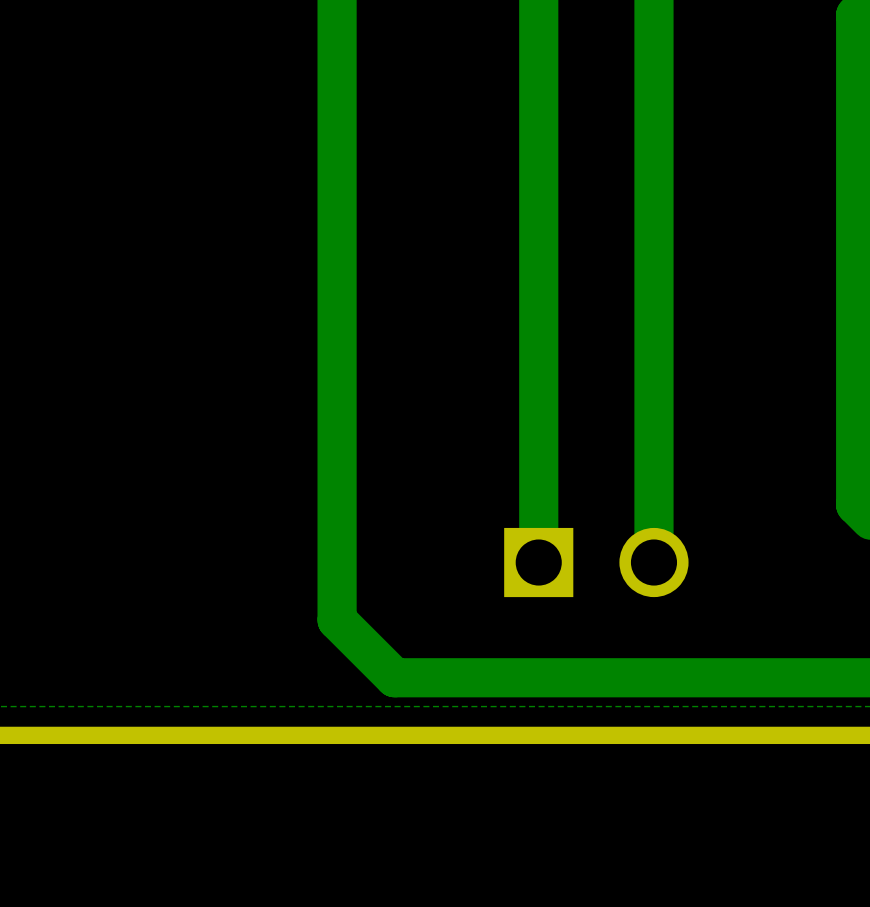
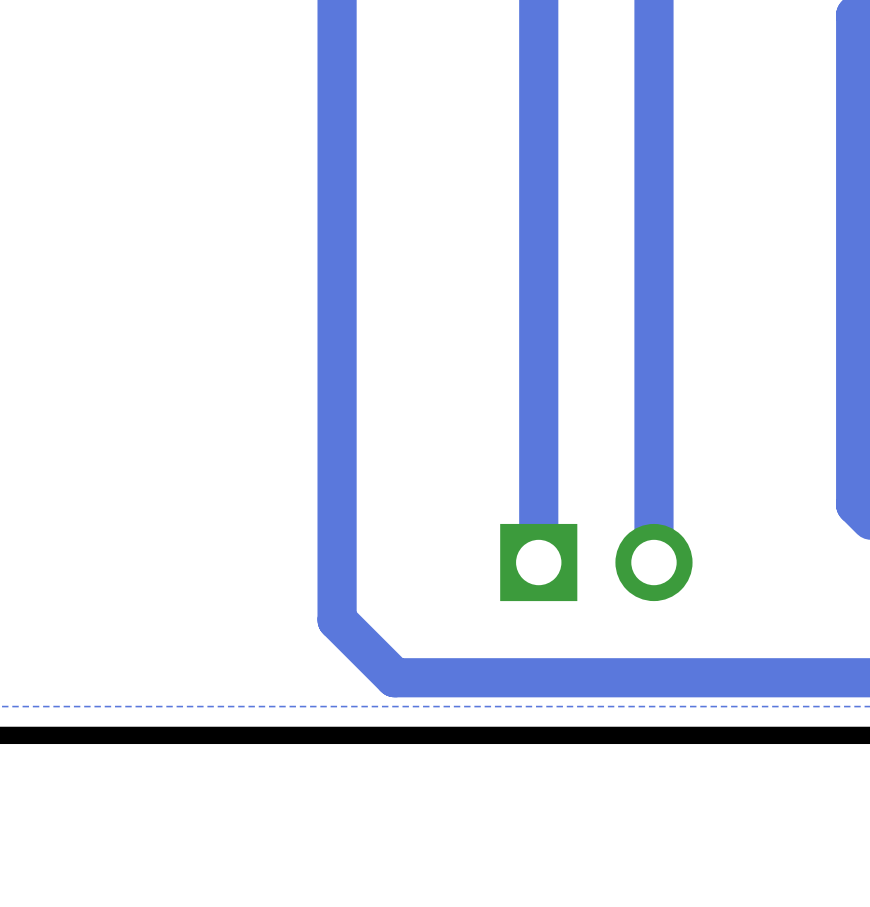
part footprint: [504, 527, 689, 598] -> [500, 523, 693, 602]

